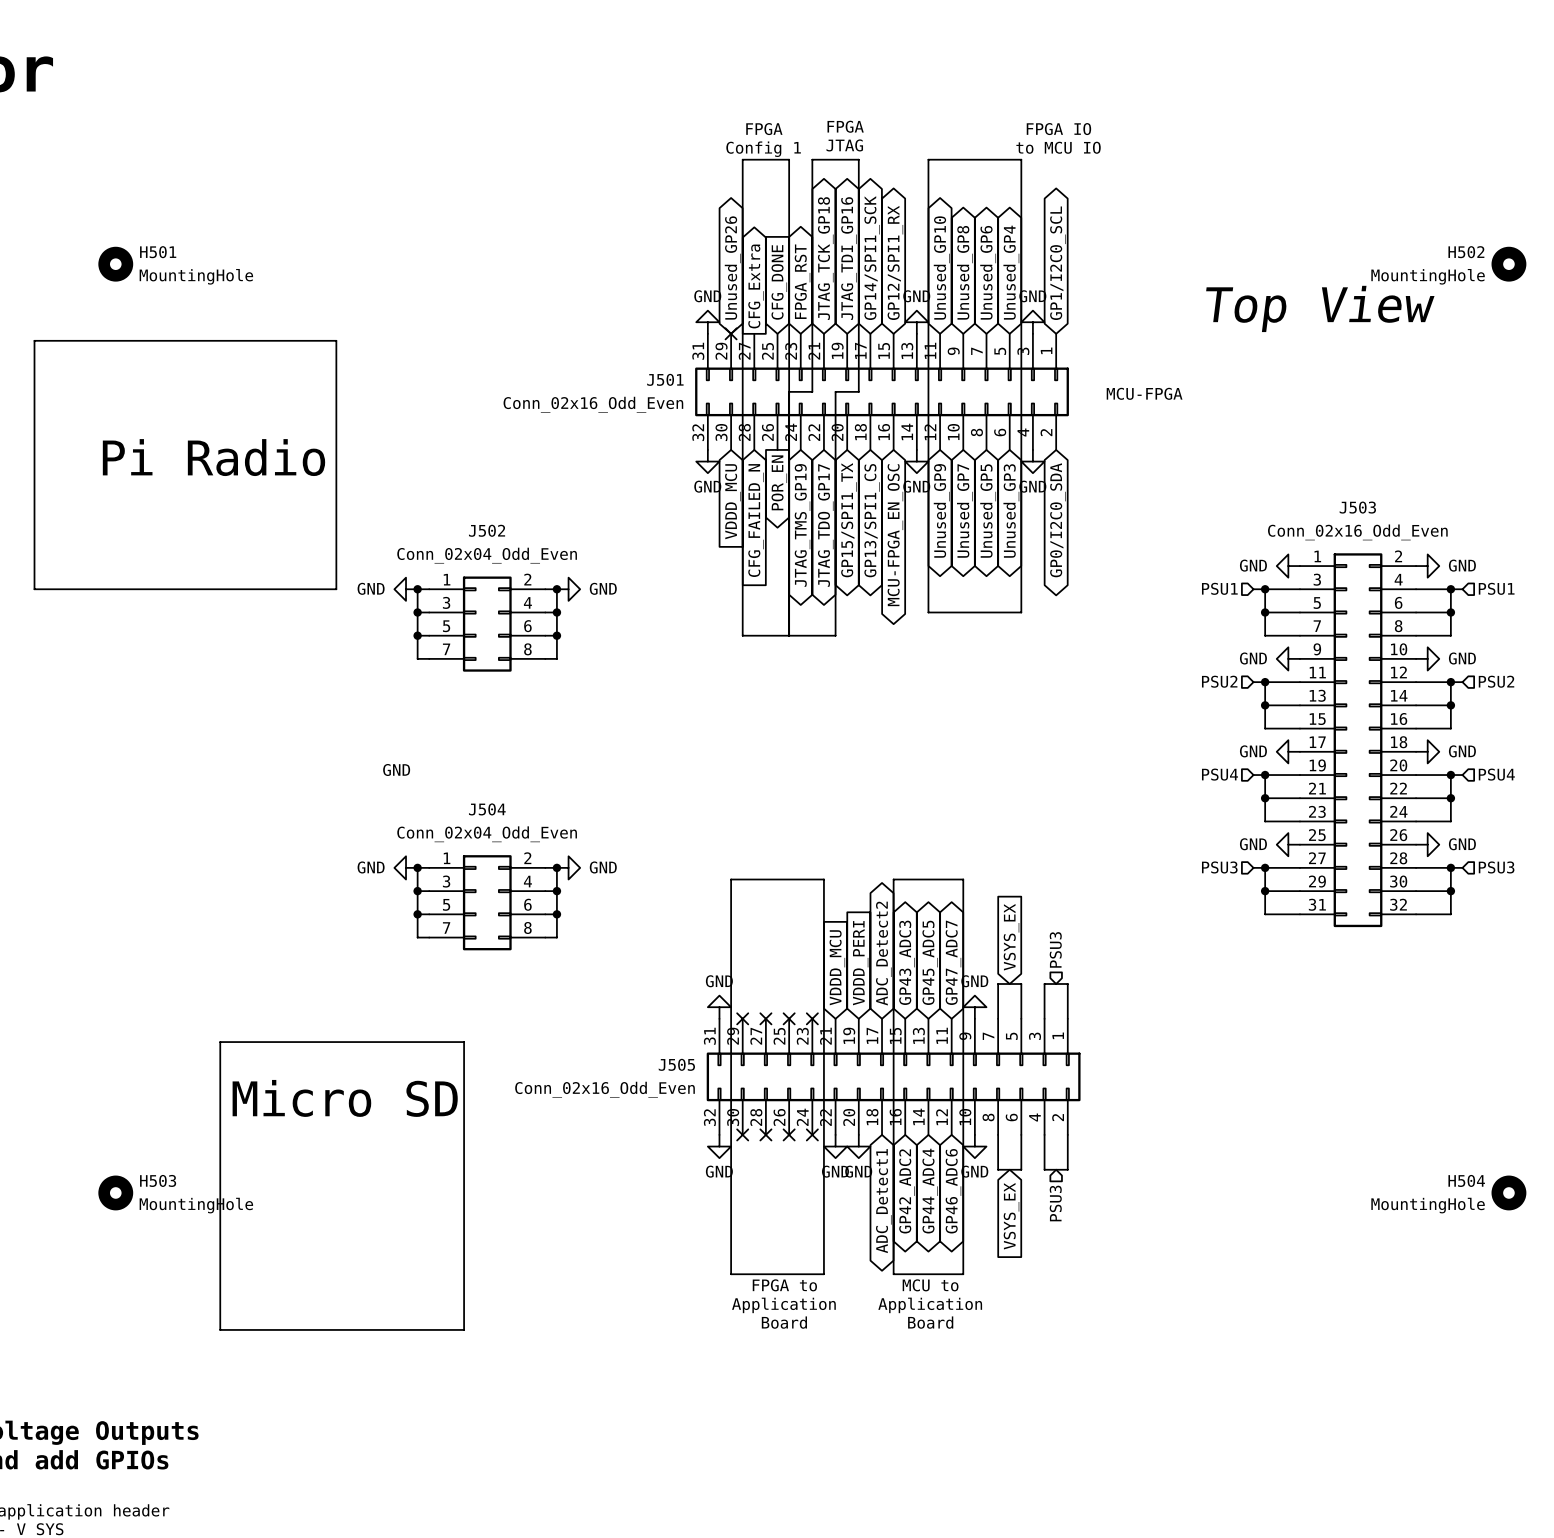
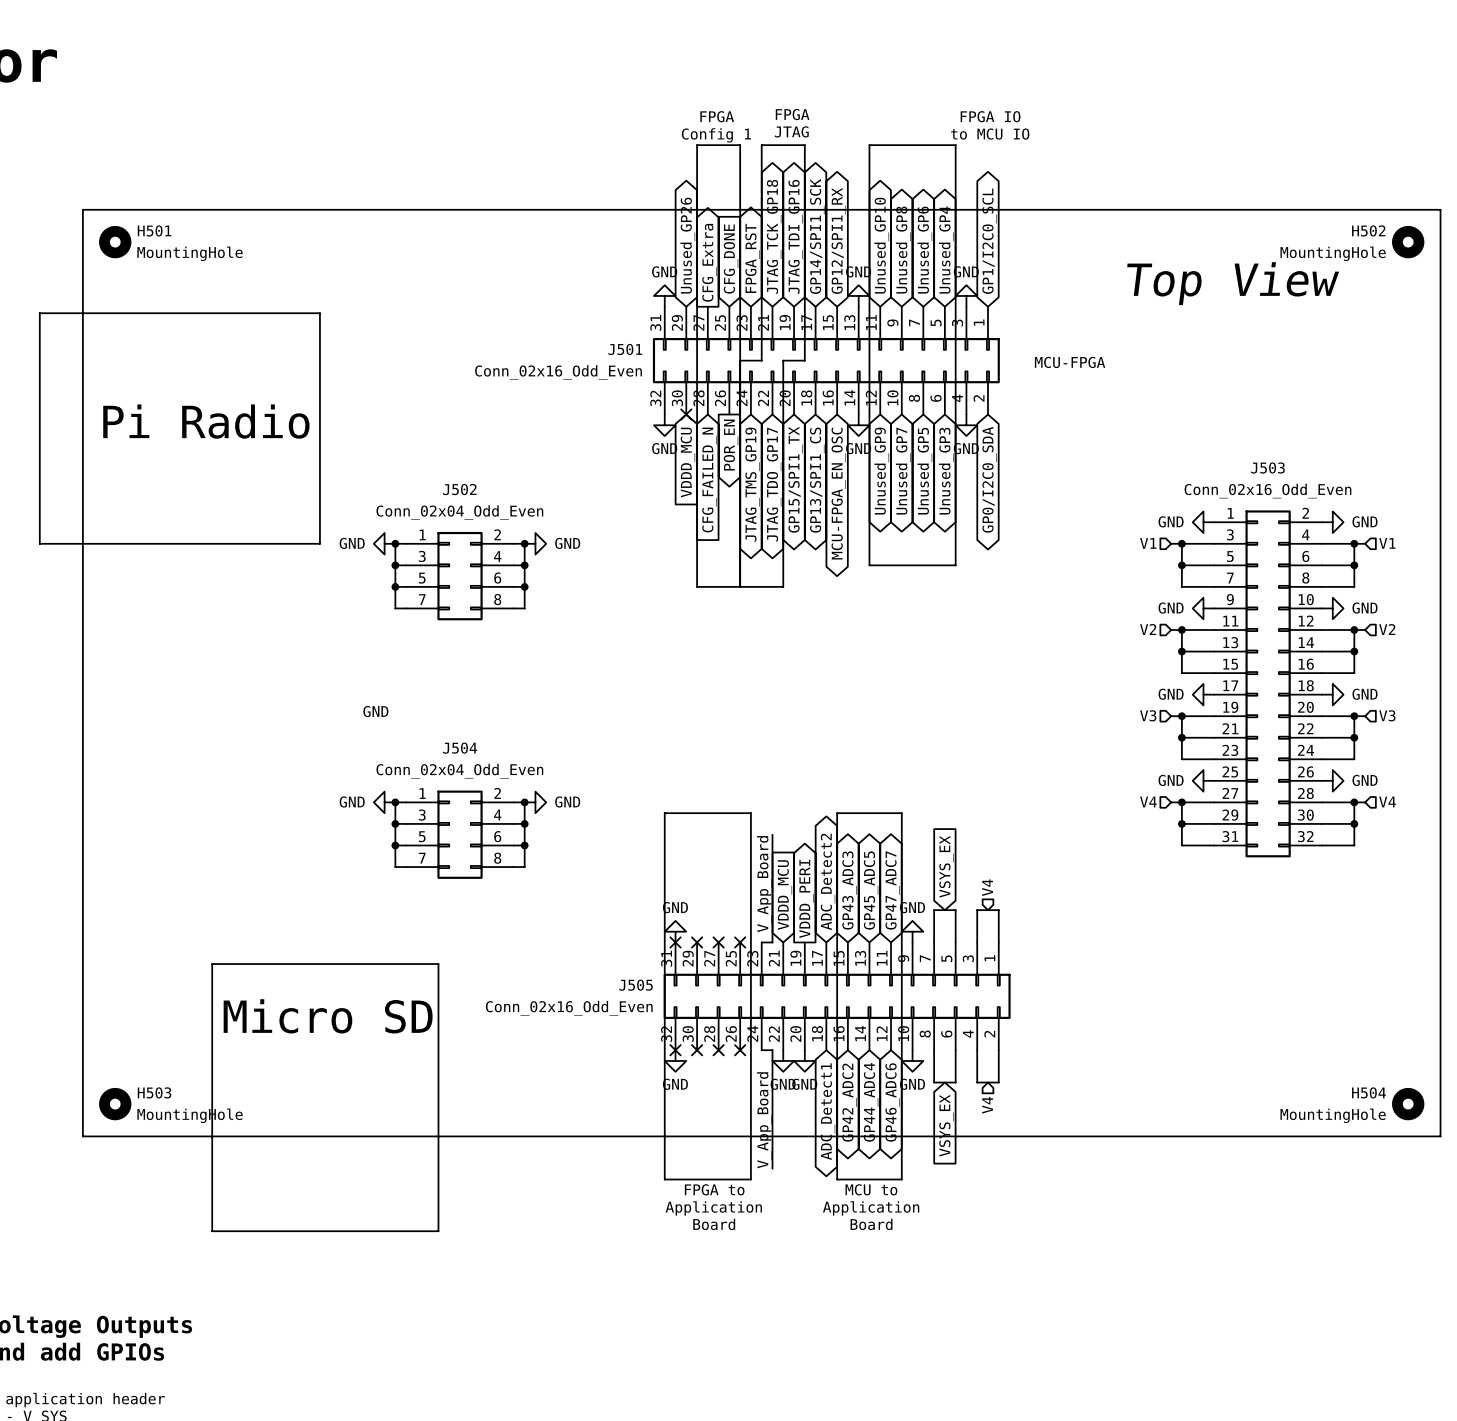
line: none -> (82, 209) (1440, 209) (1440, 1136) (82, 1136) (82, 209)
no-connect mark: (731, 333) -> none
no-connect mark: none -> (686, 414)
hierarchical label: PSU1 (1219, 588) -> V1 (1148, 543)
hierarchical label: PSU1 (1496, 588) -> V1 (1387, 543)
hierarchical label: PSU2 (1219, 681) -> V2 (1148, 629)
hierarchical label: PSU2 (1496, 681) -> V2 (1387, 629)
hierarchical label: PSU4 (1220, 774) -> V3 (1148, 715)
hierarchical label: PSU4 (1496, 774) -> V3 (1387, 715)
hierarchical label: PSU3 (1219, 867) -> V4 (1148, 801)
hierarchical label: PSU3 (1496, 867) -> V4 (1387, 801)
line: (731, 879) (731, 1274) -> (686, 813) (664, 813) (664, 1179) (686, 1179)
line: (800, 879) (823, 879) (823, 1274) (800, 1274) -> (750, 813) (750, 1179)
hierarchical label: PSU3 (1055, 949) -> V4 (987, 887)
label: none -> V_App_Board (764, 884)
global label shape: input (860, 963) -> output (806, 898)
no-connect mark: none -> (675, 942)
no-connect mark: (812, 1018) -> none
no-connect mark: none -> (675, 1050)
no-connect mark: (812, 1134) -> none
hierarchical label: PSU3 (1055, 1203) -> V4 (987, 1105)
label: none -> V_App_Board (764, 1120)
text position: FPGA to (784, 1285) -> FPGA to (714, 1189)
text position: Application (783, 1305) -> Application (713, 1208)
text position: Board (784, 1322) -> Board (714, 1224)

